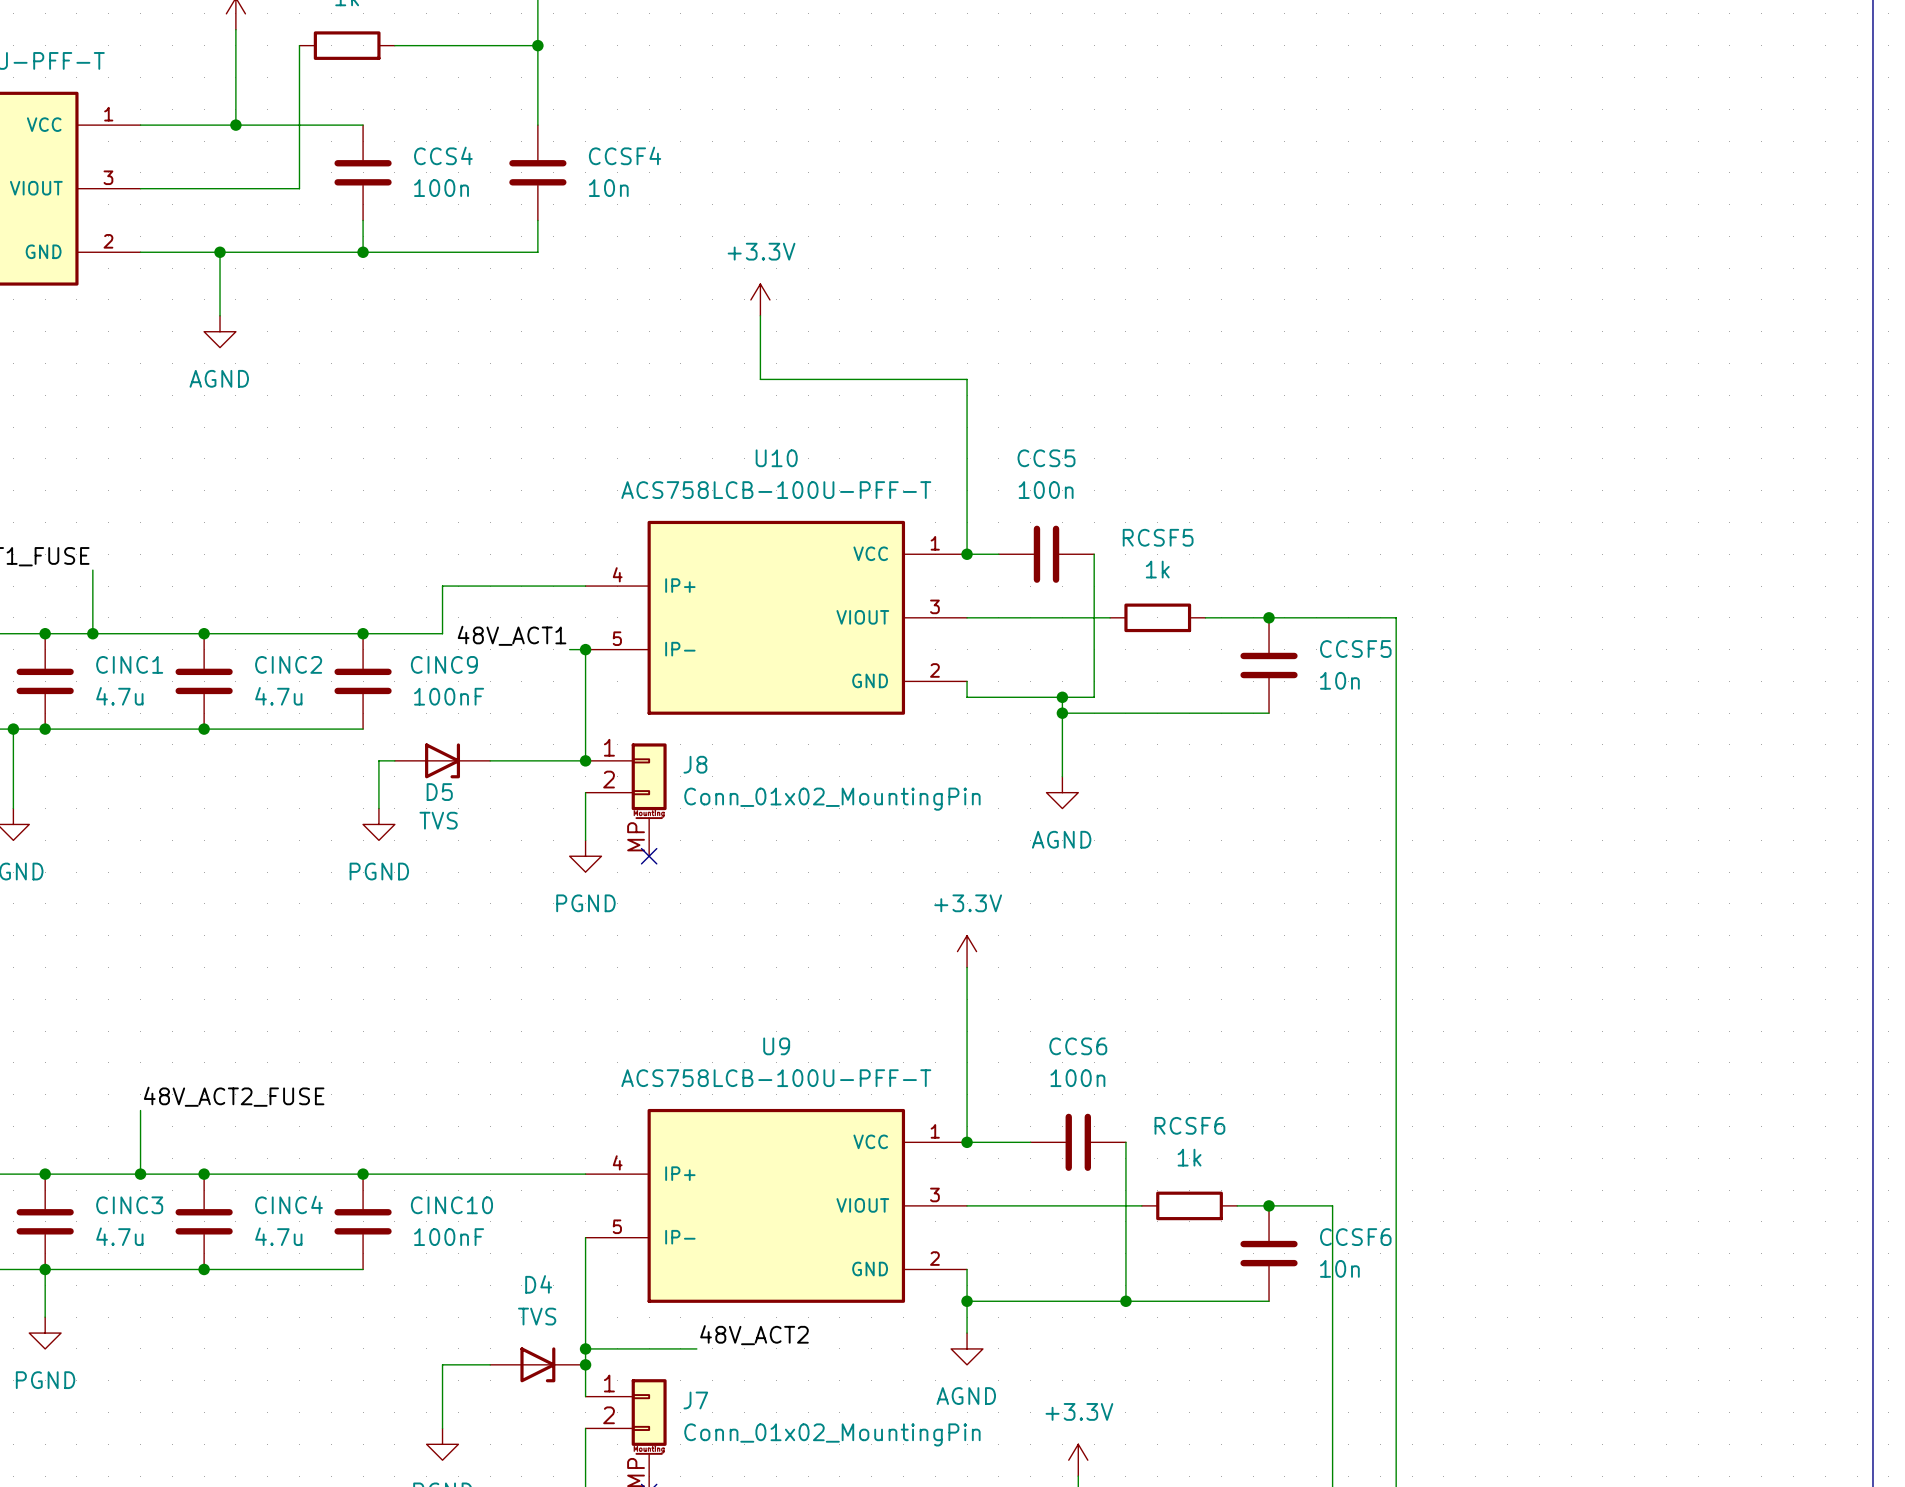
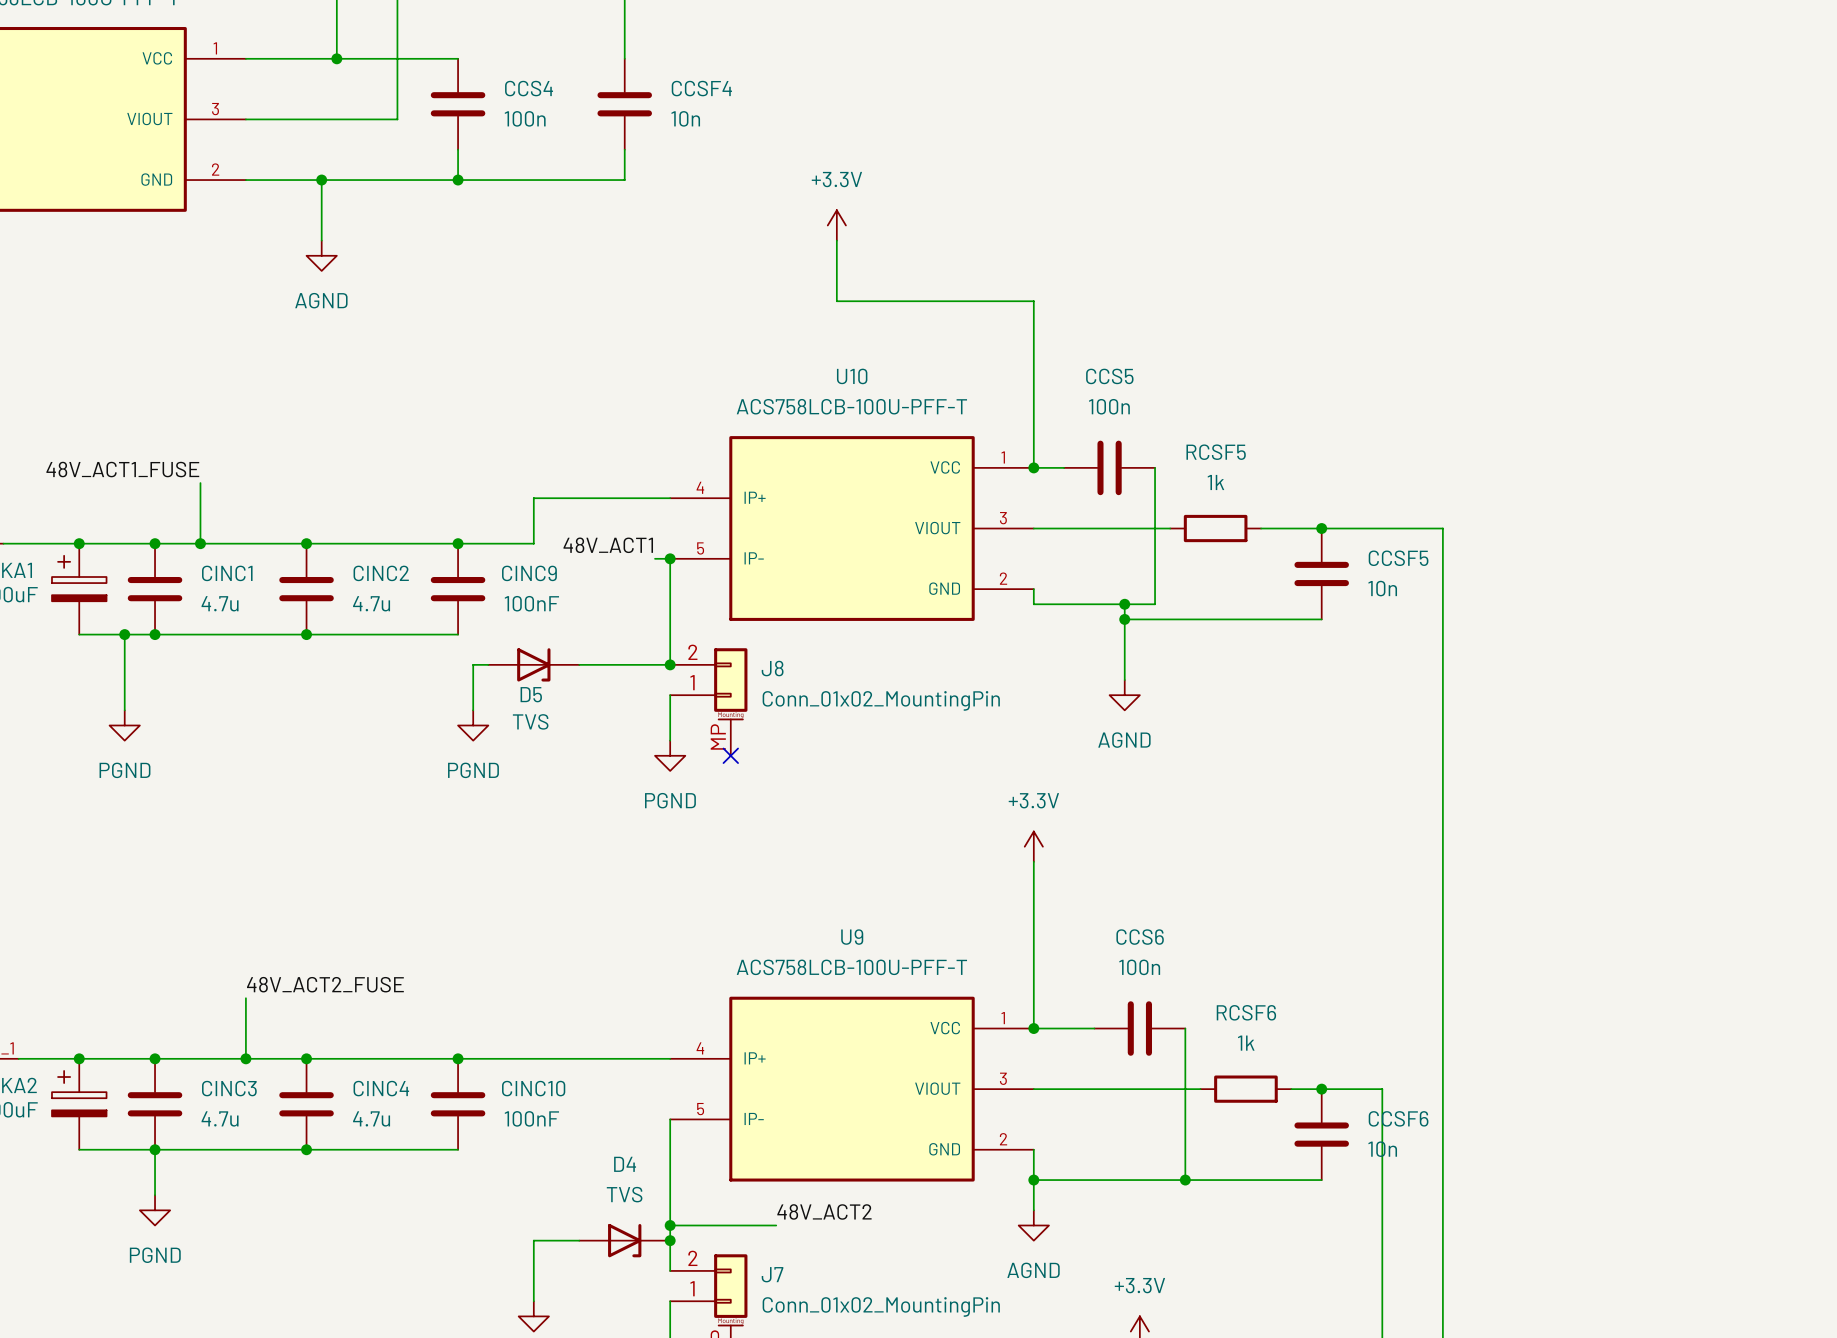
J8 pin number: 1 (609, 747) -> 2 (692, 652)
J8 pin number: 2 (609, 779) -> 1 (692, 682)
J7 pin number: 1 (609, 1383) -> 2 (692, 1258)
J7 pin number: 2 (609, 1415) -> 1 (692, 1288)

